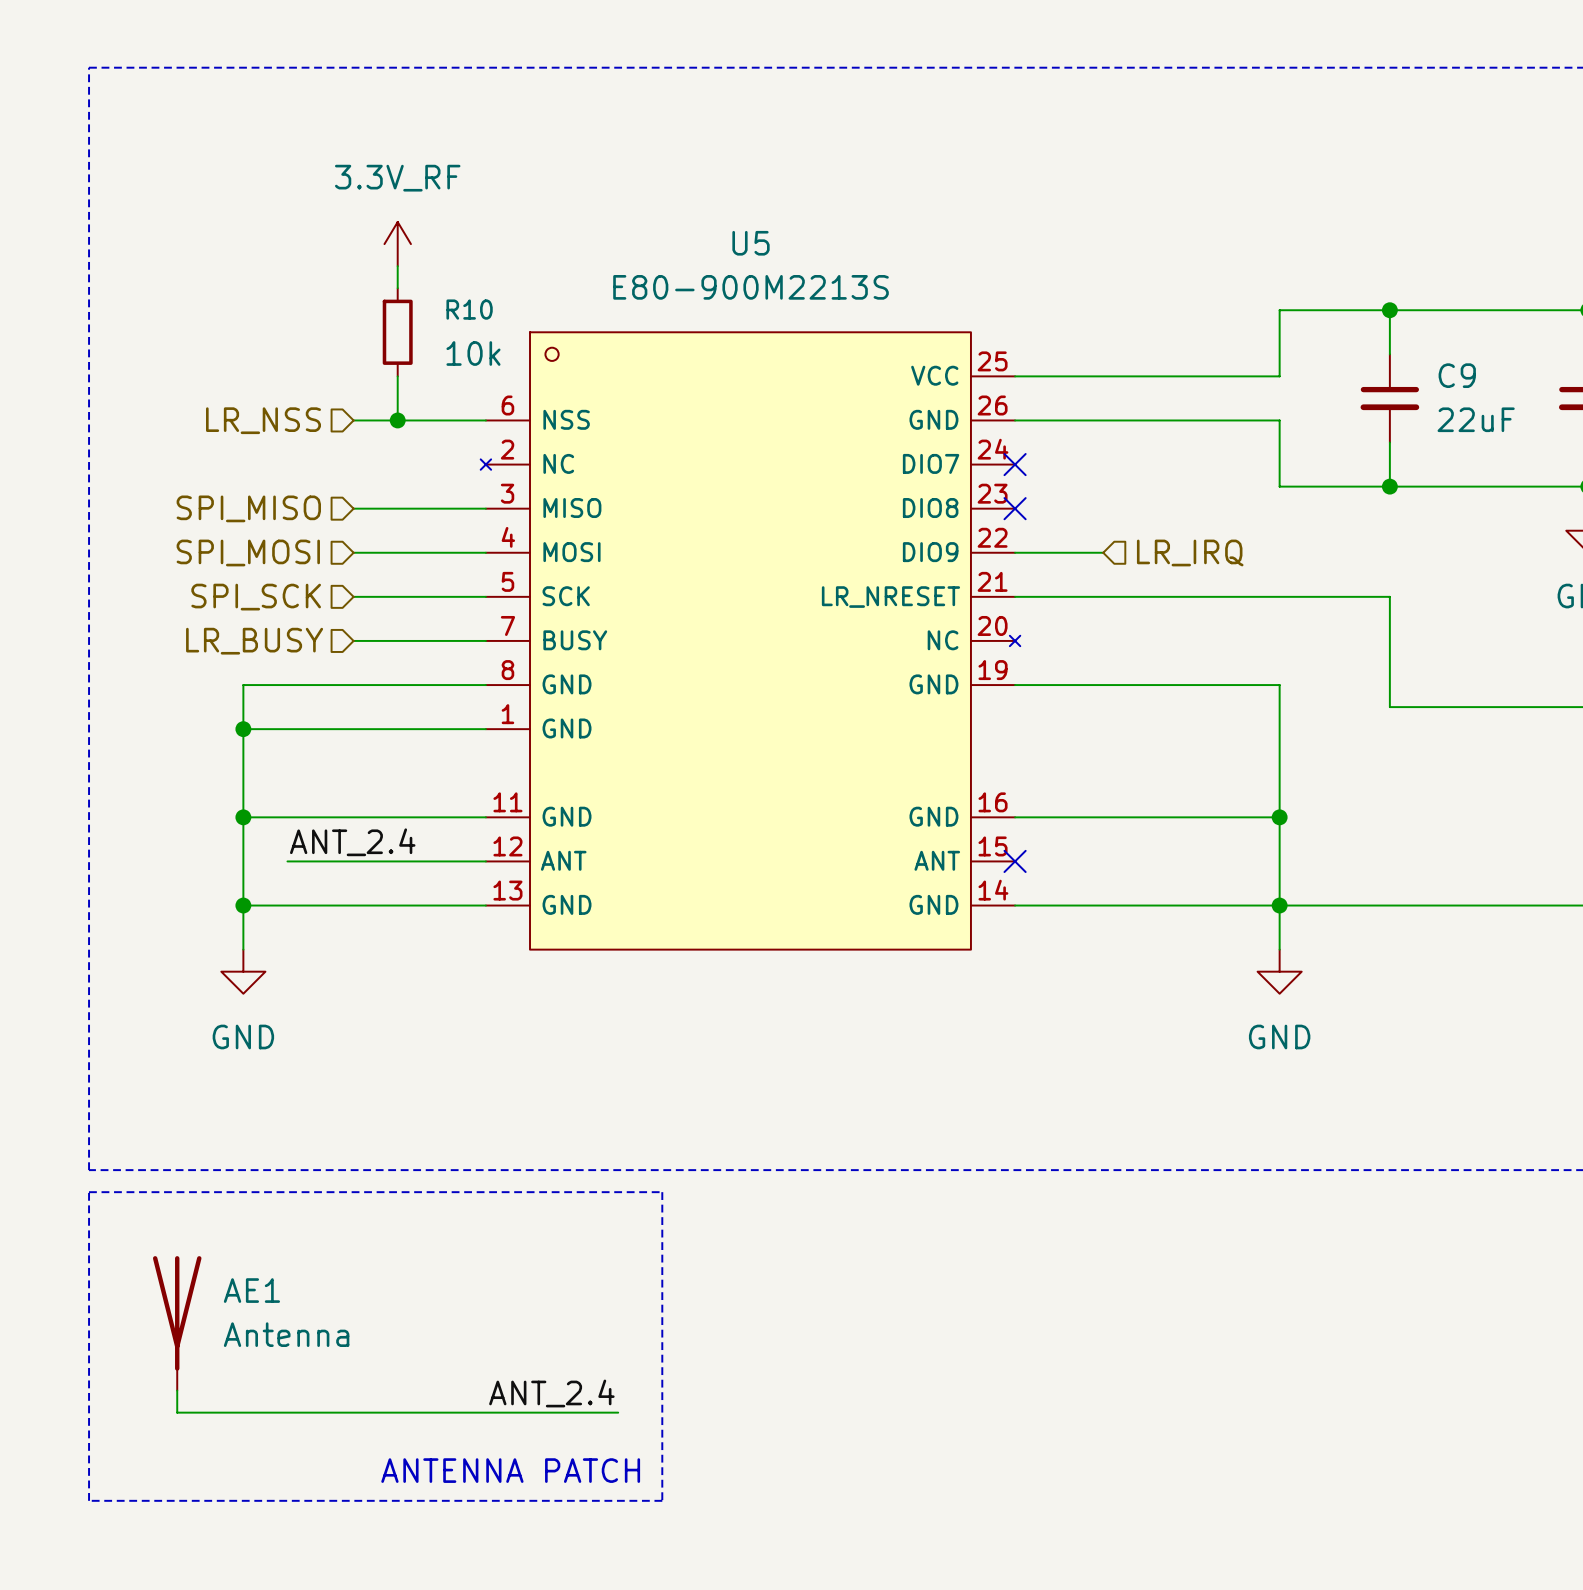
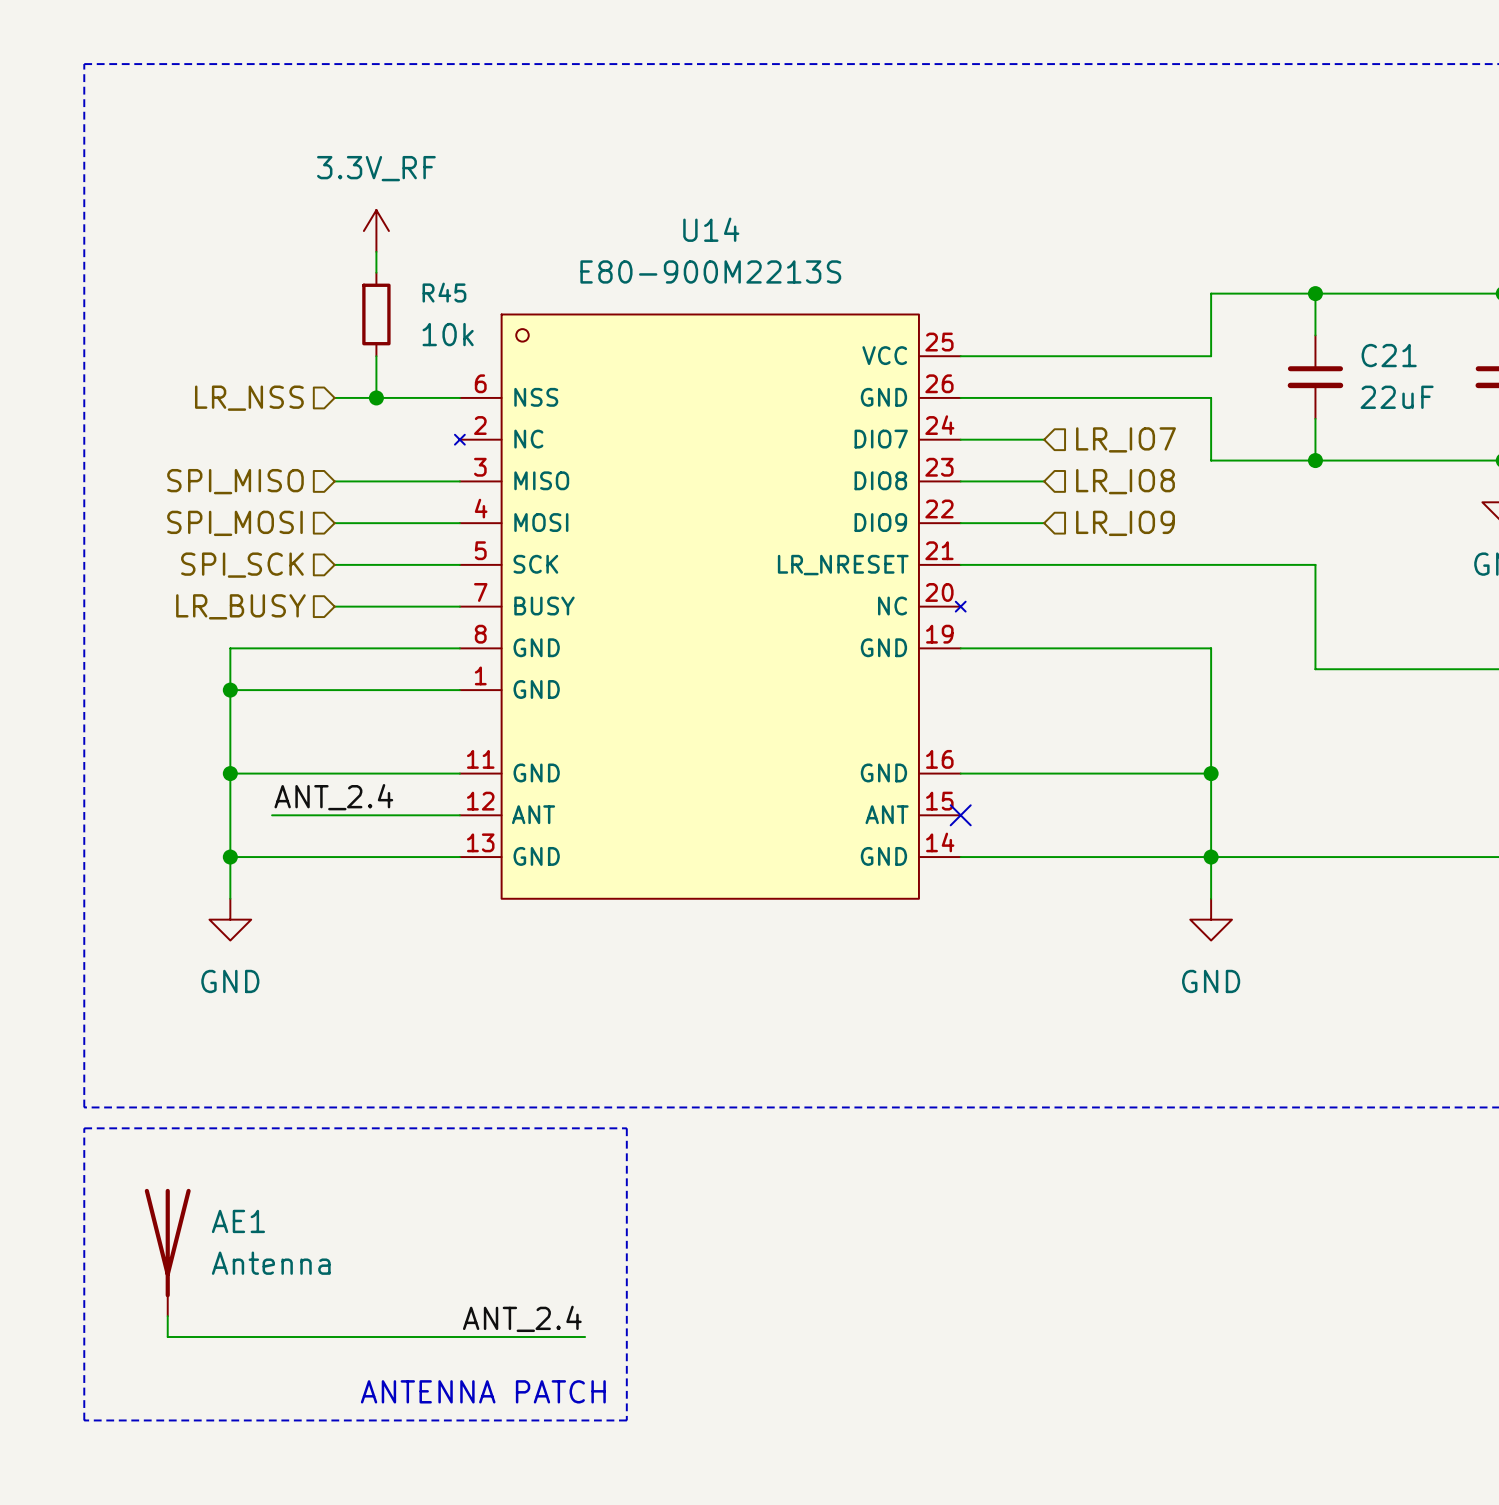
U5 name: U5 (751, 243) -> U14 (711, 229)
R10 name: R10 (469, 309) -> R45 (444, 292)
C9 name: C9 (1457, 375) -> C21 (1389, 355)
wire: none -> (960, 439) (1044, 439)
no-connect mark: (1015, 464) -> none
hierarchical label: none -> LR_IO7 (1125, 439)
wire: none -> (960, 481) (1044, 481)
no-connect mark: (1015, 508) -> none
hierarchical label: none -> LR_IO8 (1125, 481)
hierarchical label: LR_IRQ (1190, 552) -> LR_IO9 (1125, 523)

